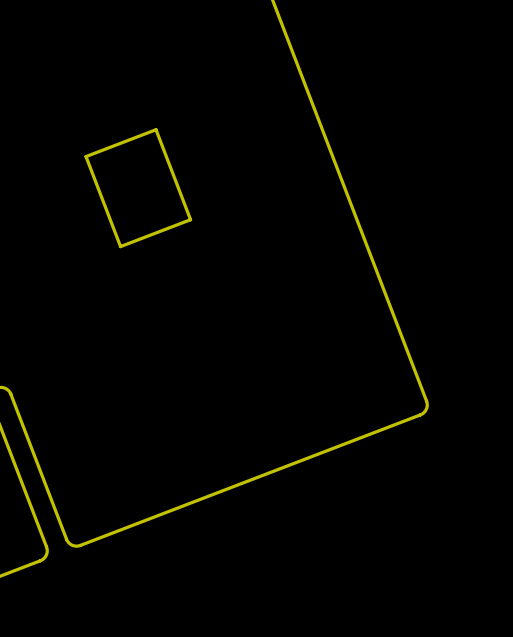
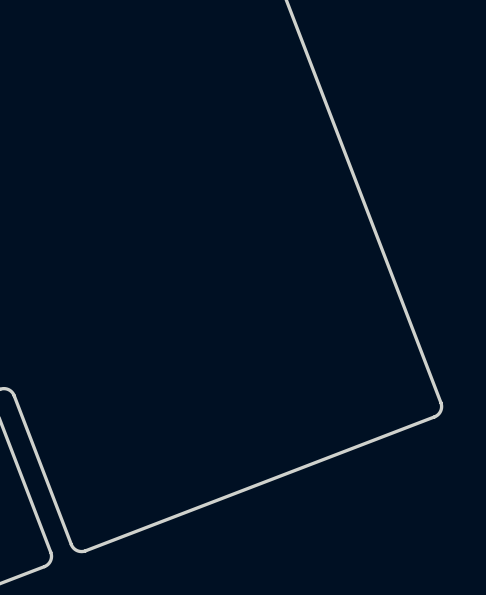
board edge: (156, 129) (86, 156) (120, 246) (190, 219) (156, 129) -> none

